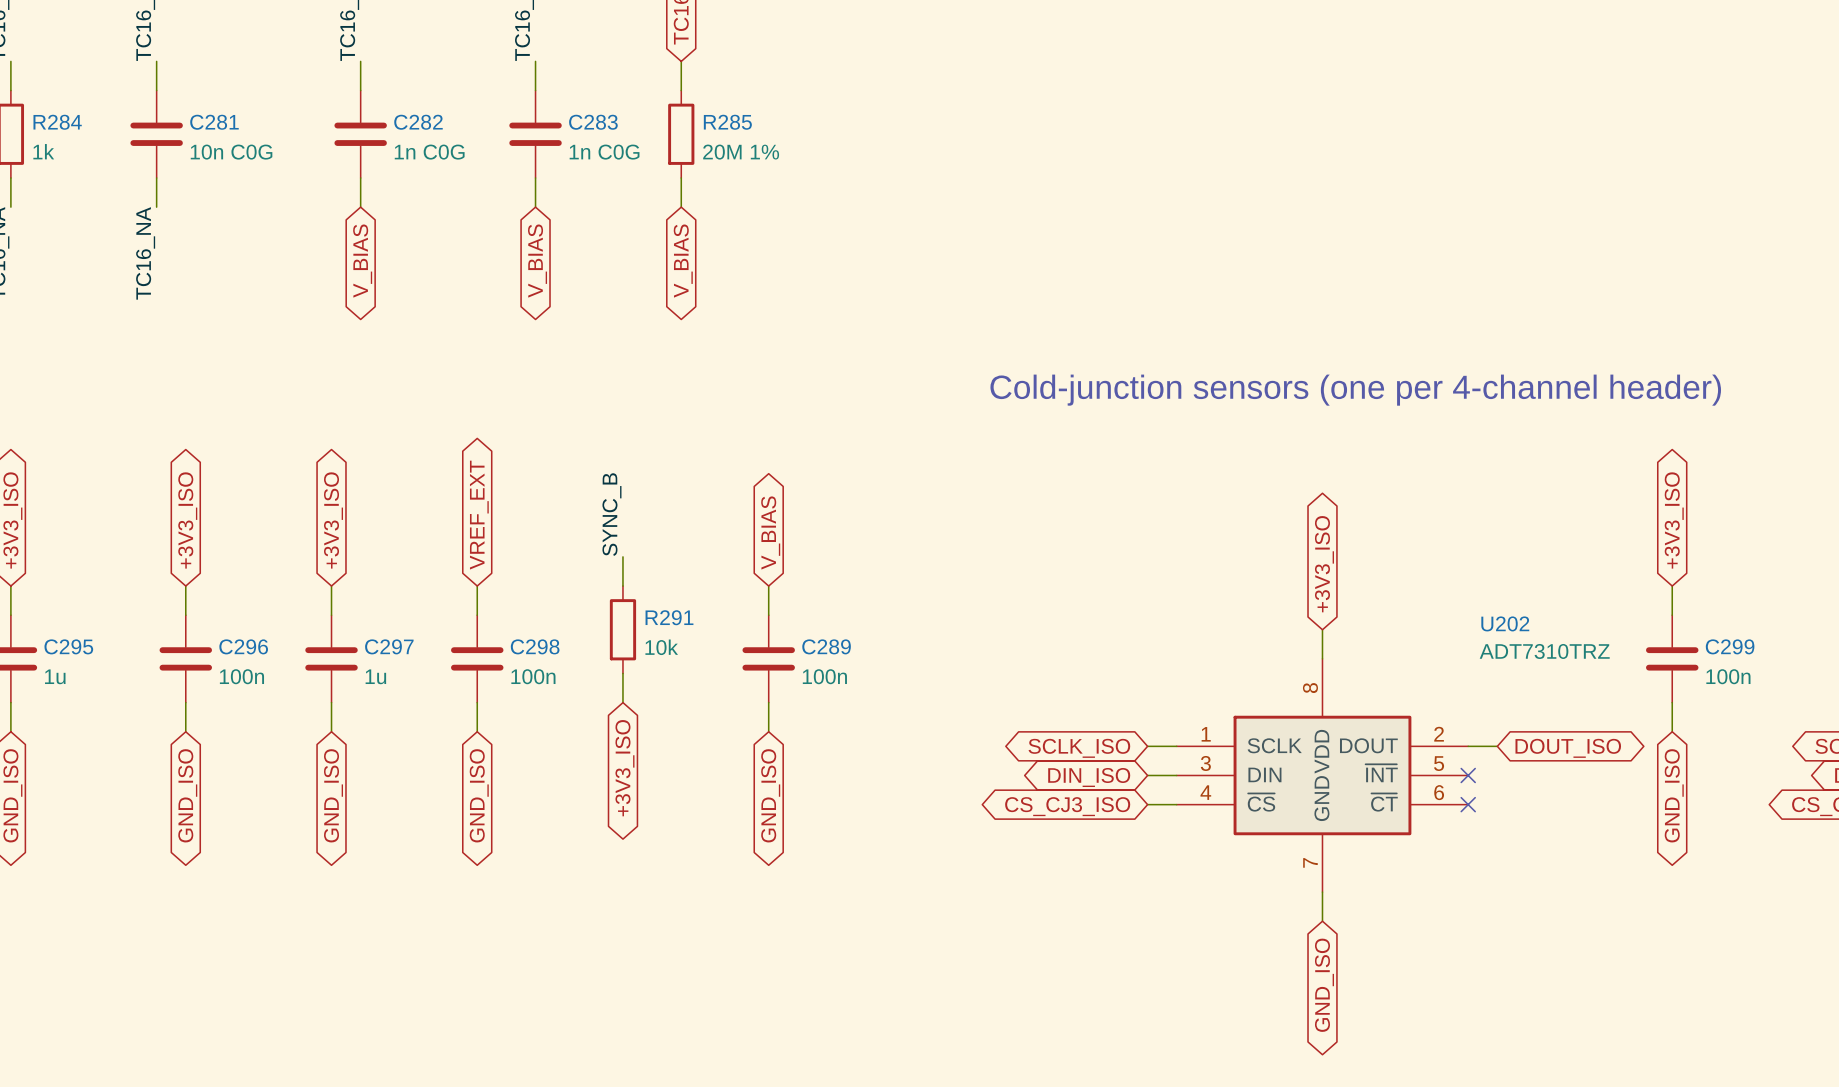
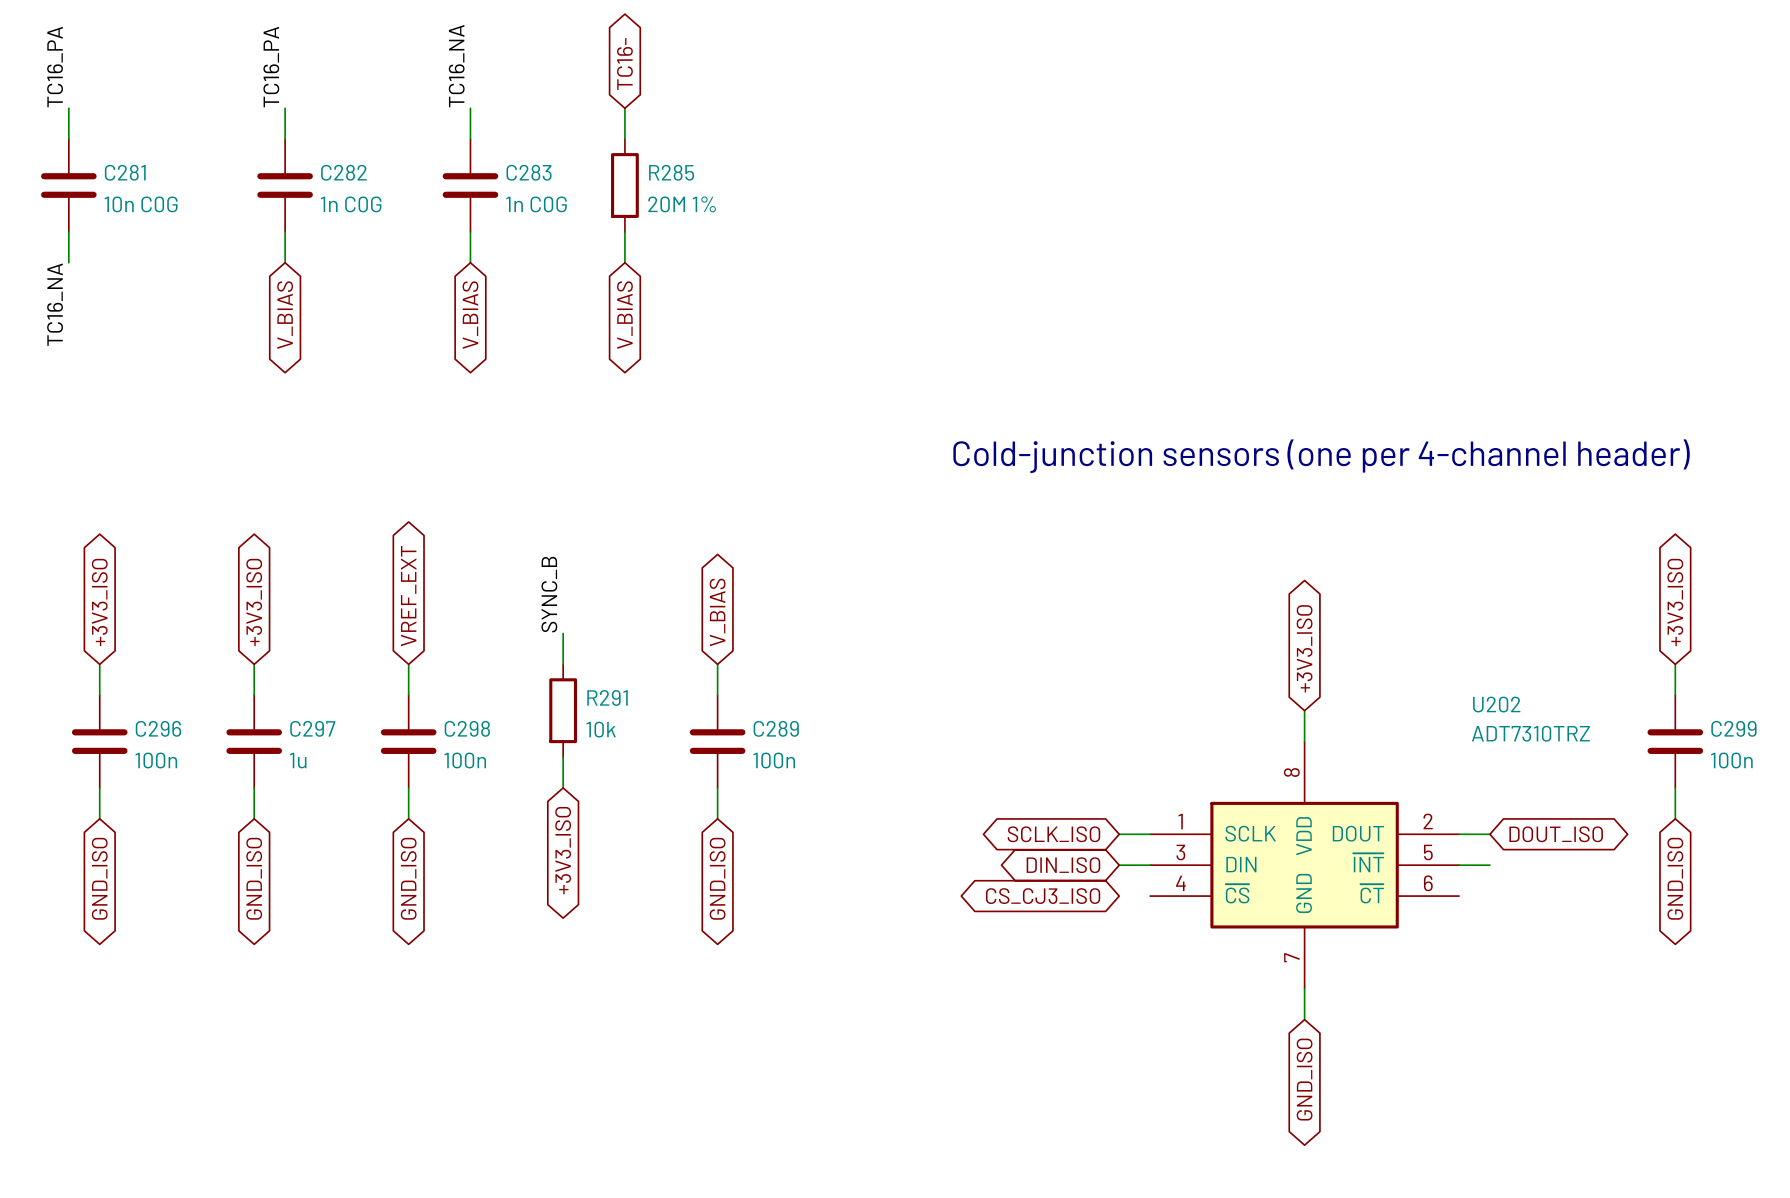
wire: none -> (1459, 865) (1489, 865)
no-connect mark: (1468, 775) -> none
wire: (1147, 804) (1176, 804) -> none
no-connect mark: (1468, 804) -> none

